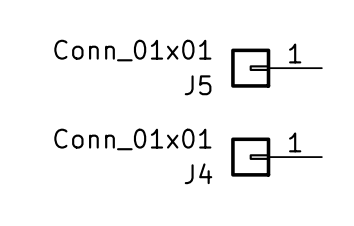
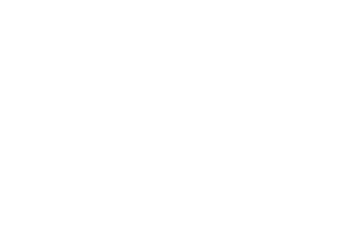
J5: Conn_01x01 (276, 68) -> none
J4: Conn_01x01 (276, 157) -> none

